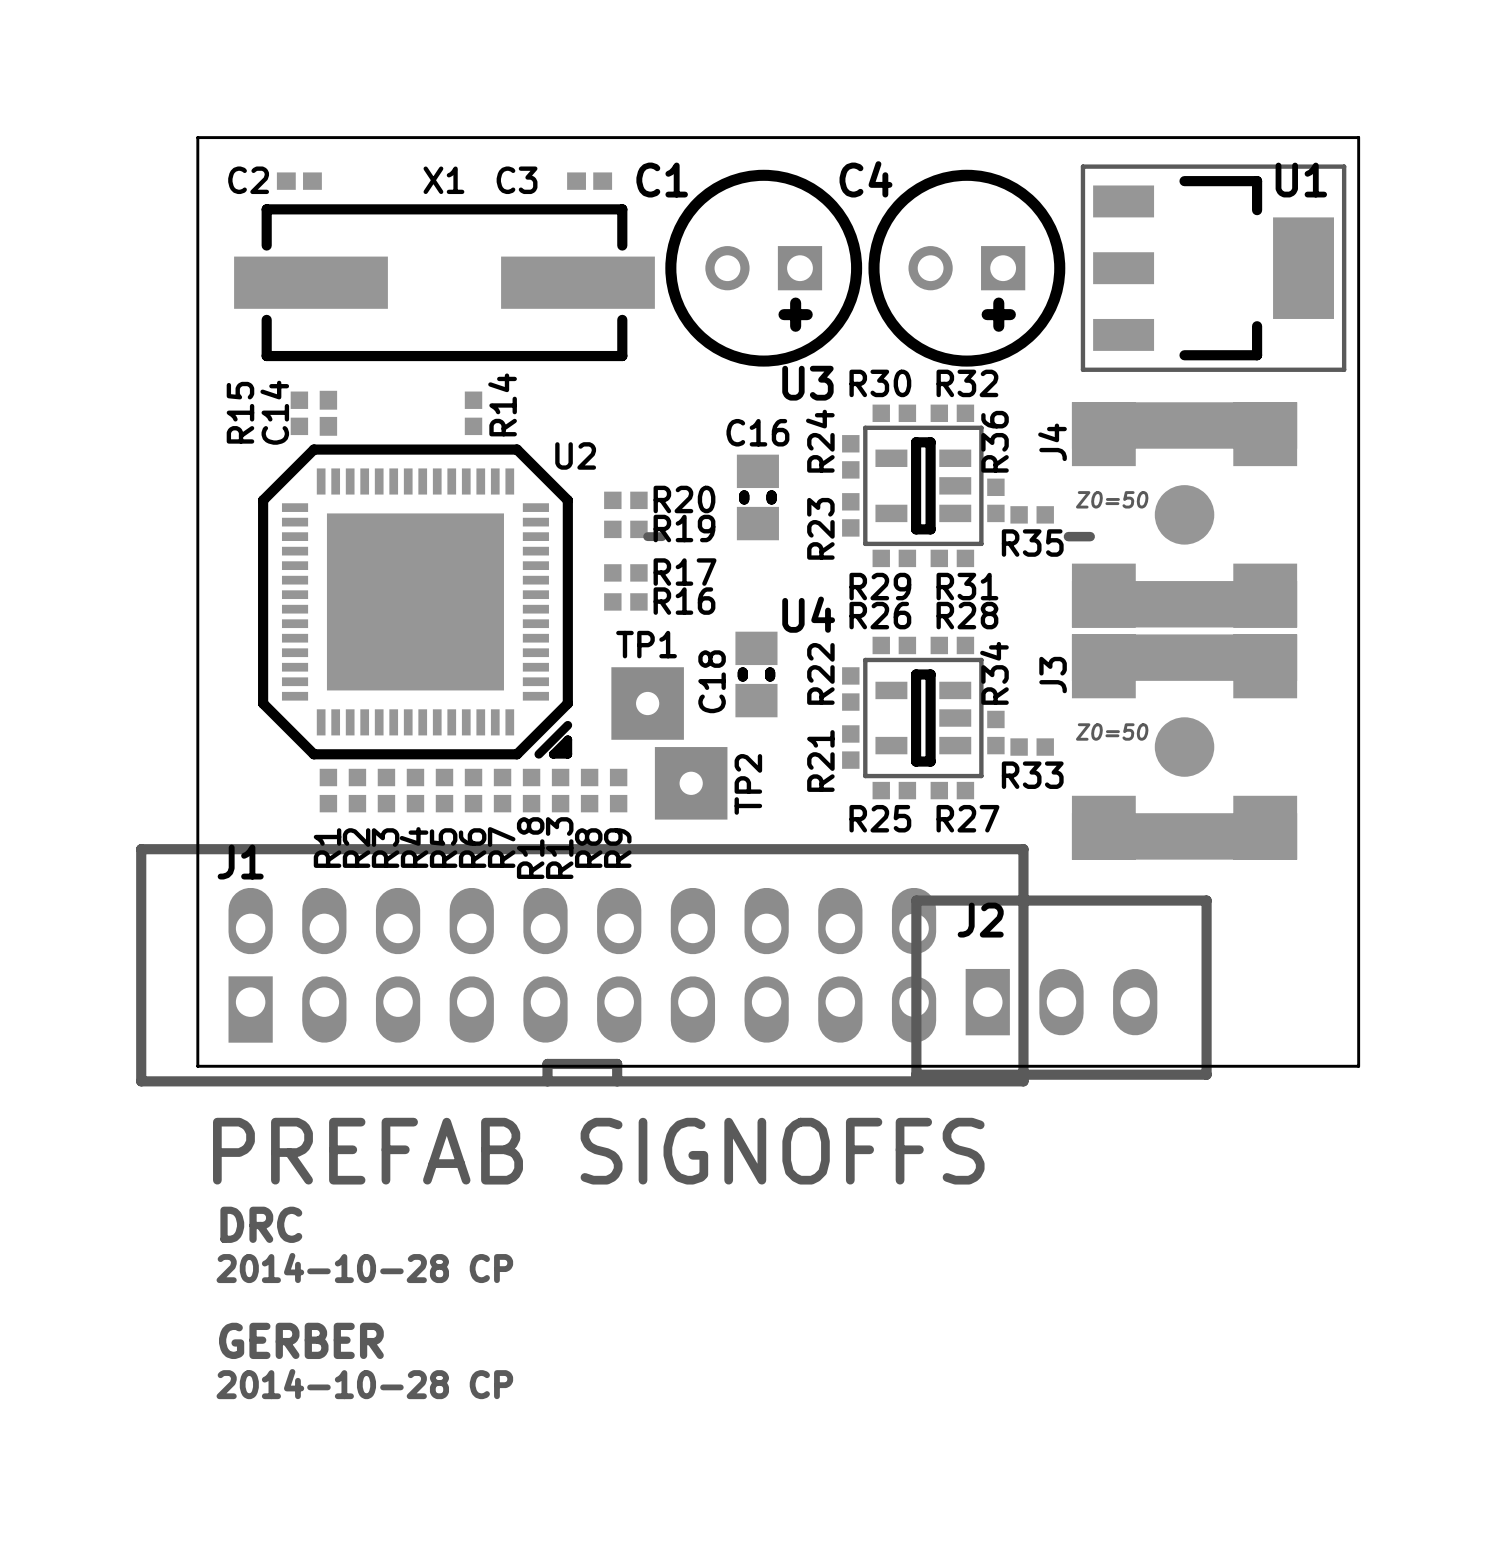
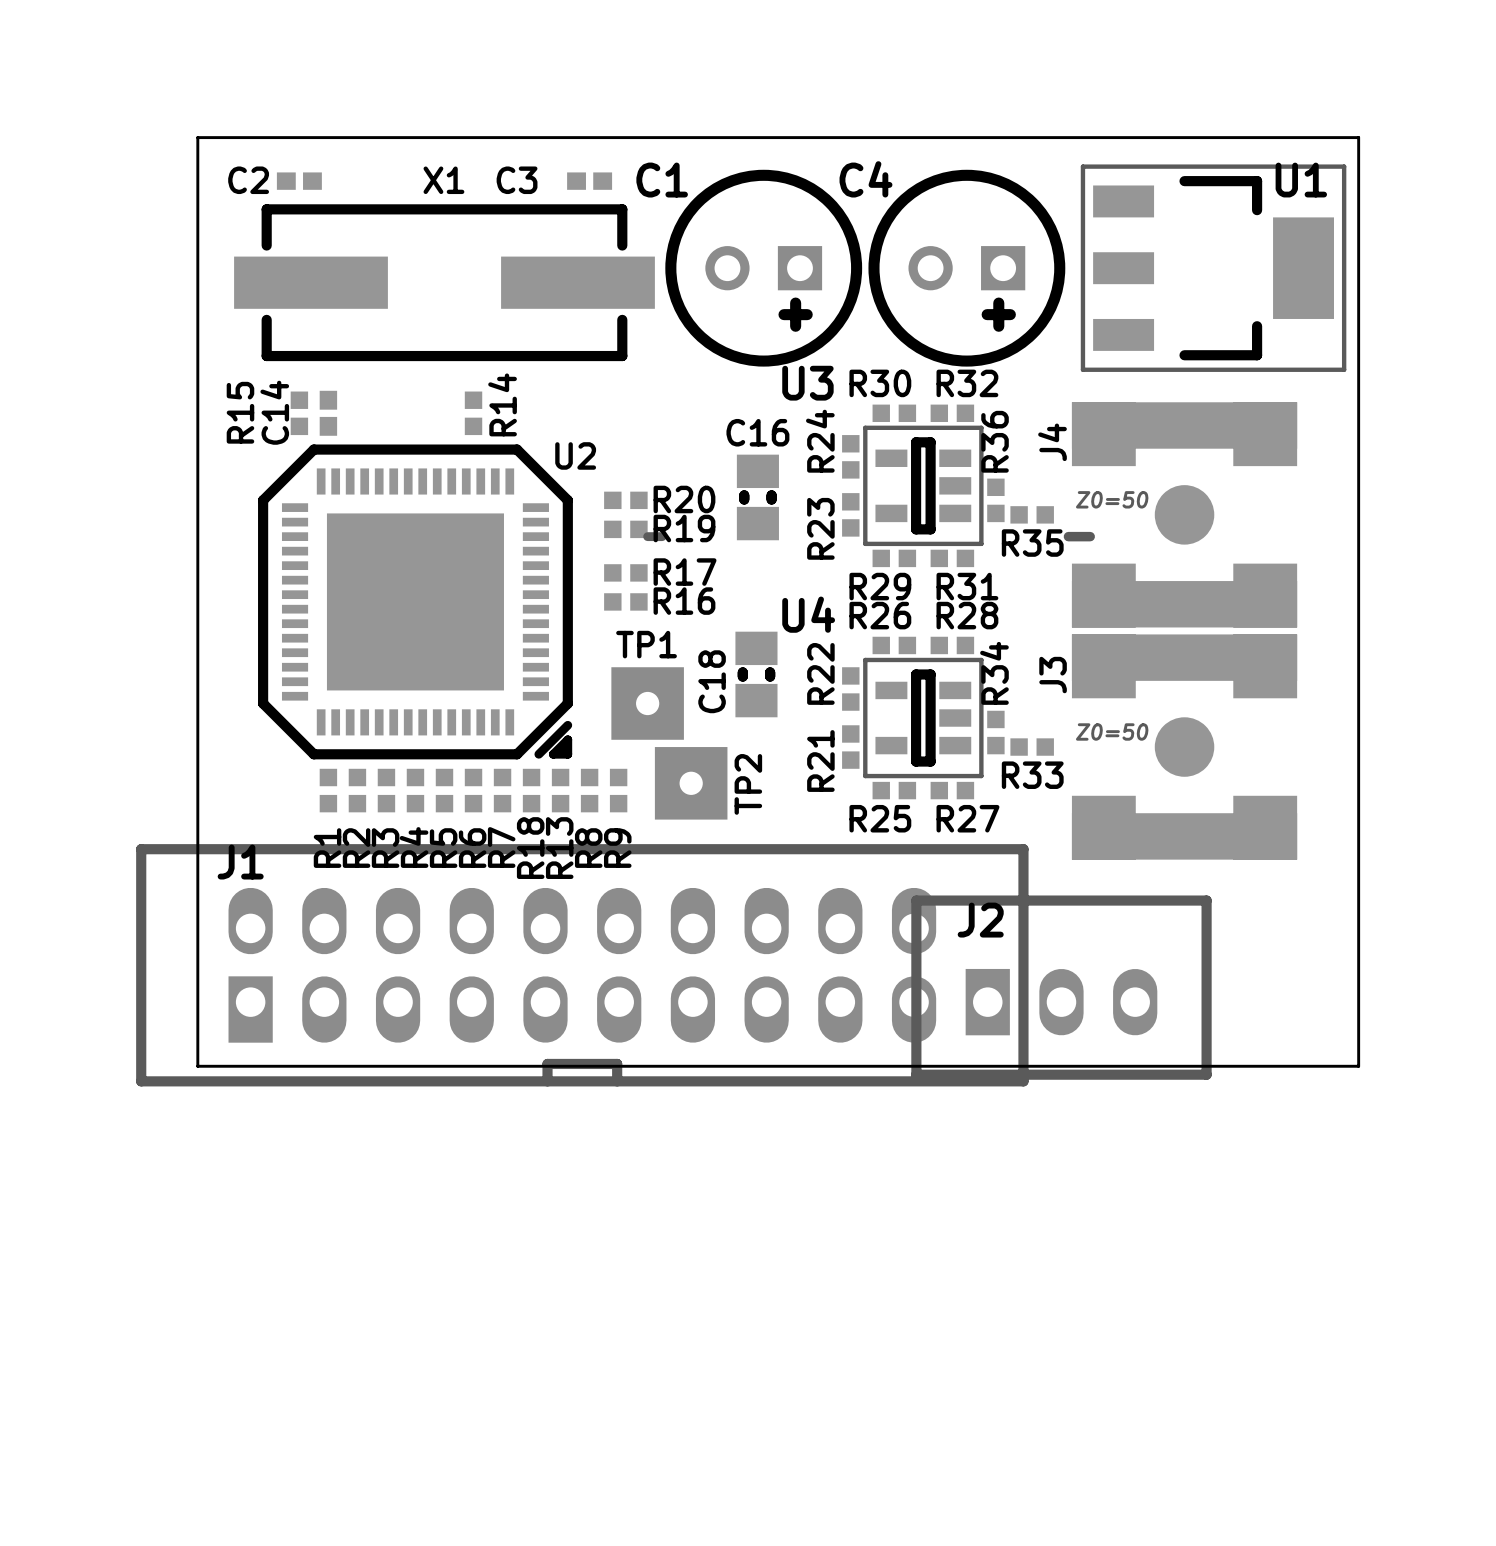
text: PREFAB SIGNOFFS (598, 1151) -> none
text: DRC (261, 1224) -> none
text: 2014-10-28 CP (364, 1268) -> none
text: GERBER (301, 1340) -> none
text: 2014-10-28 CP (364, 1384) -> none

